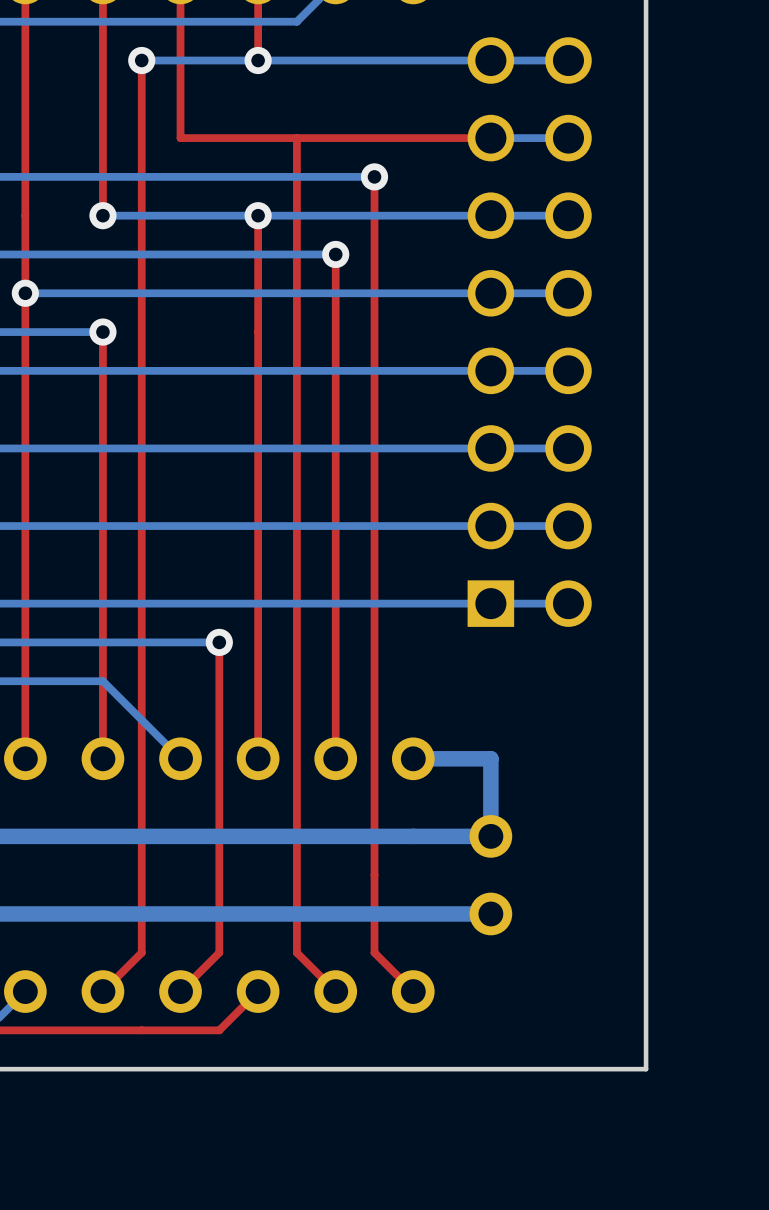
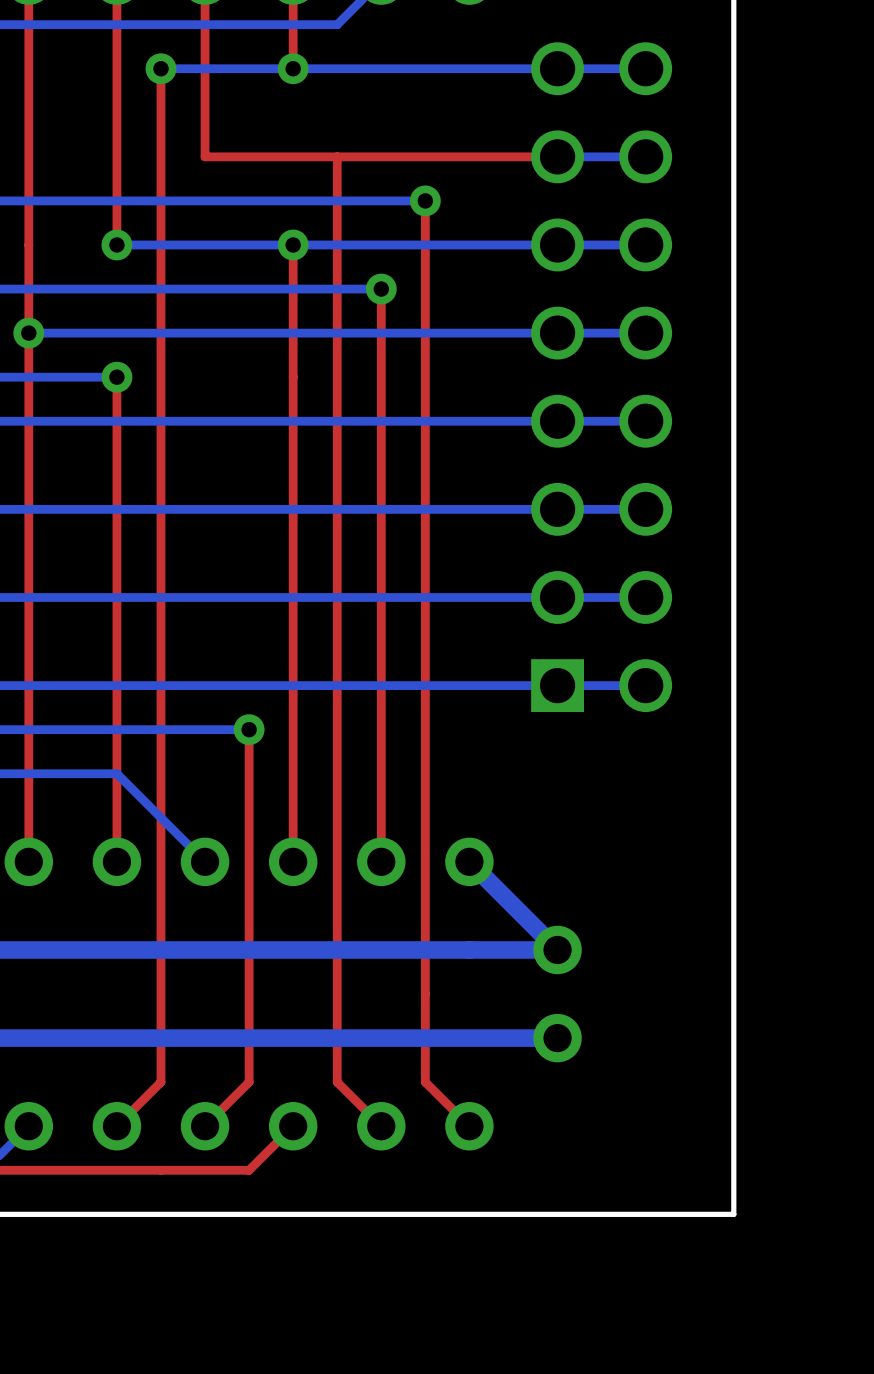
bottom track: (413, 758) (490, 758) (490, 836) -> (469, 861) (557, 949)

